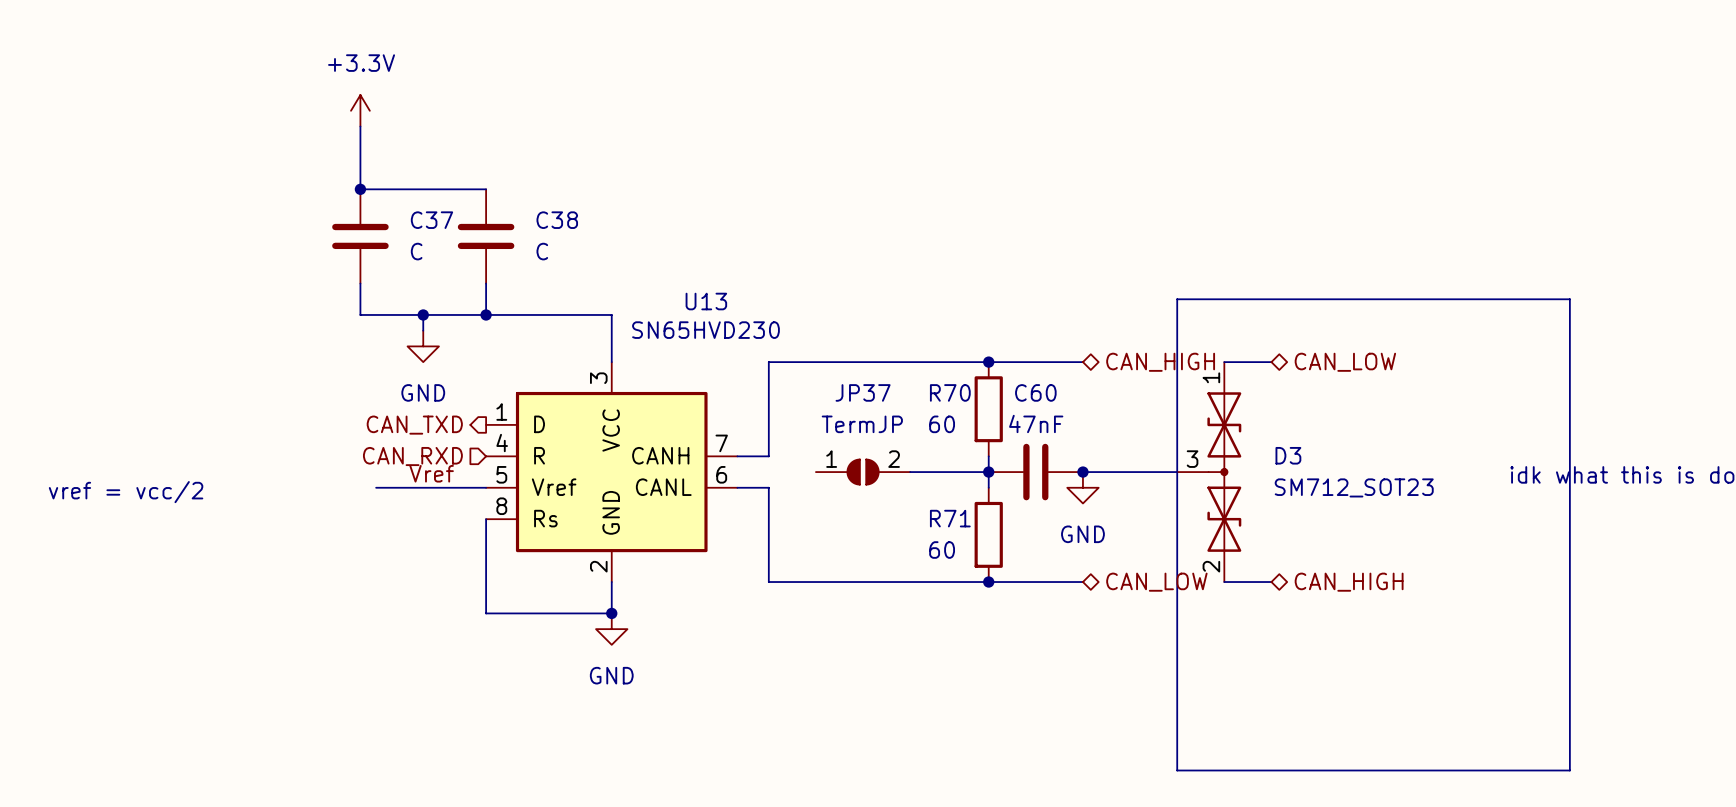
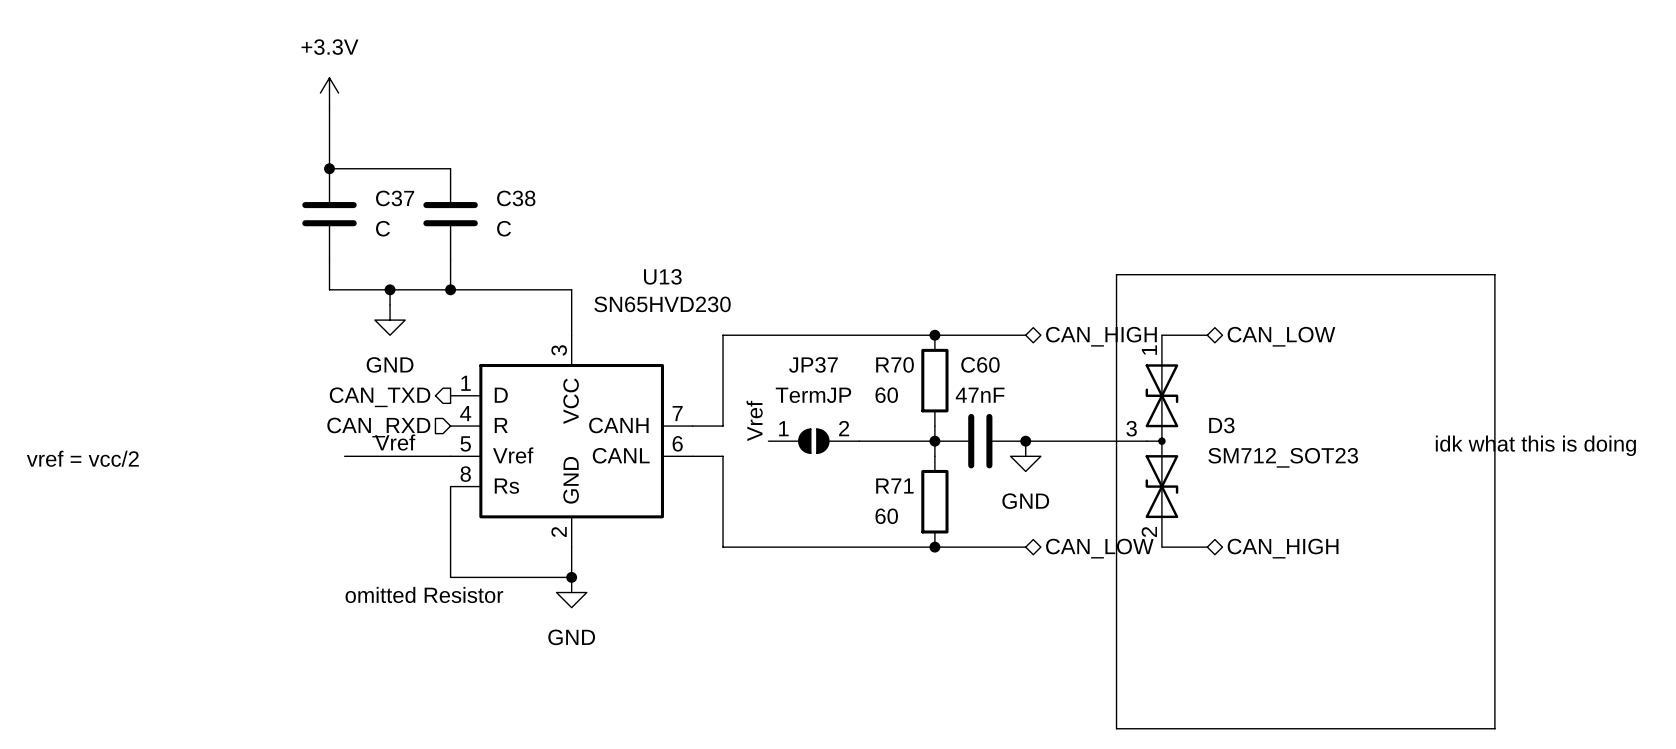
label: none -> Vref (754, 420)
text: none -> omitted Resistor (424, 594)

